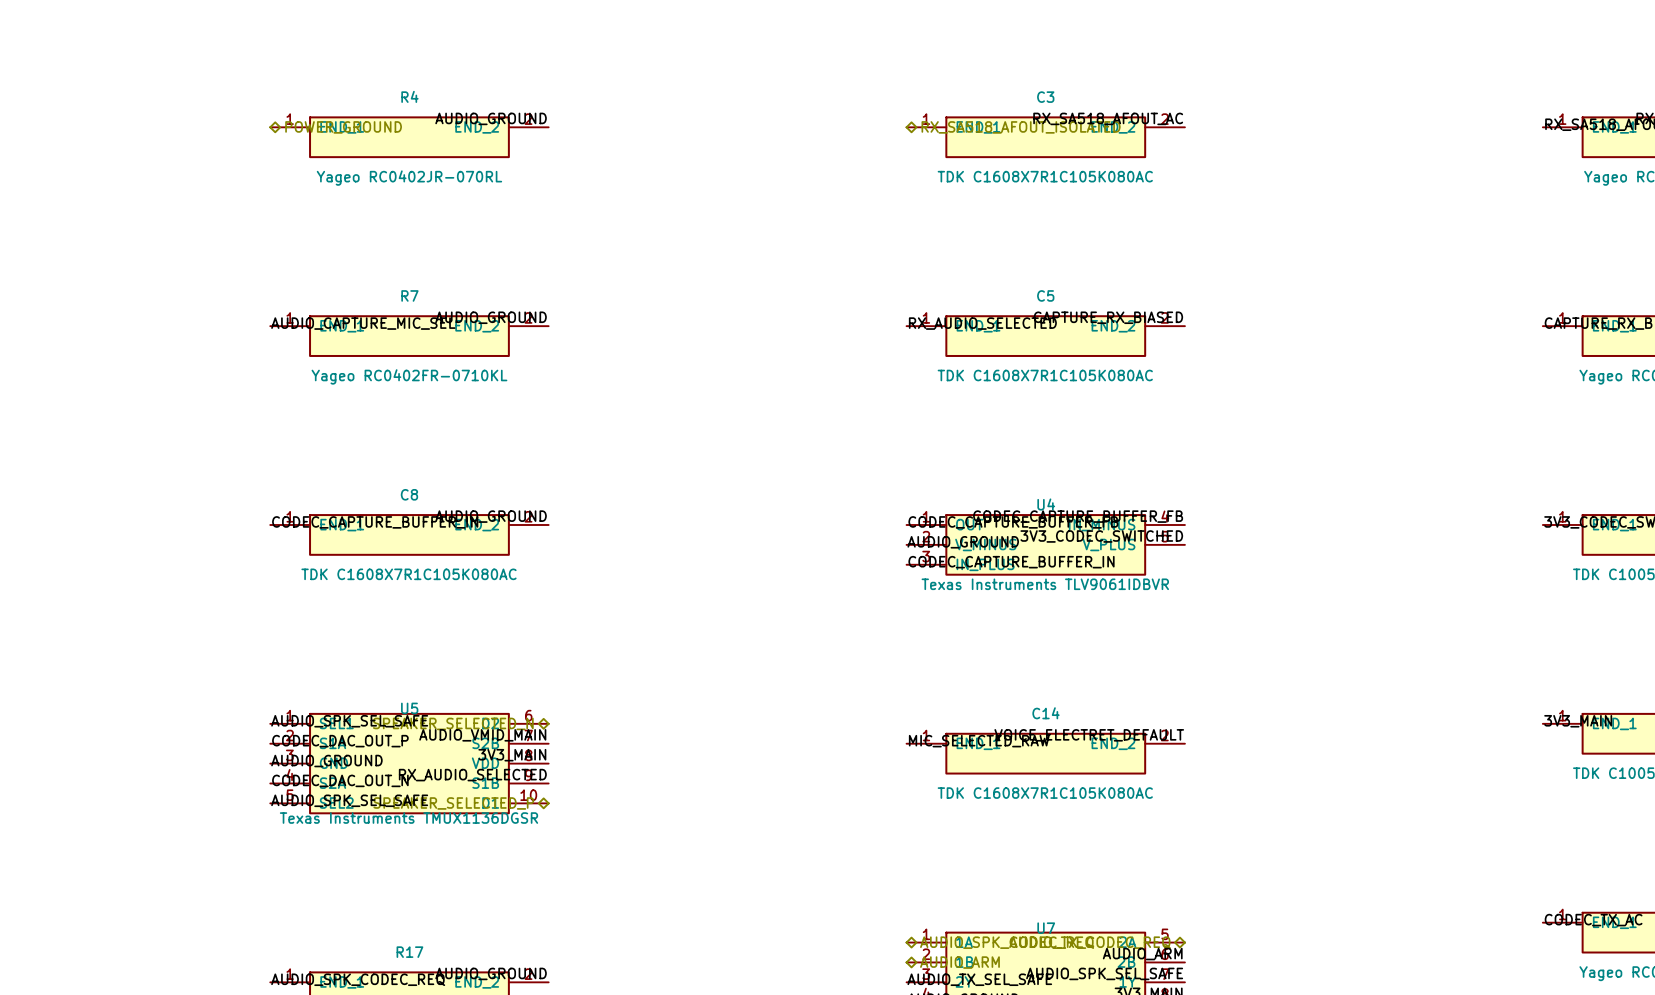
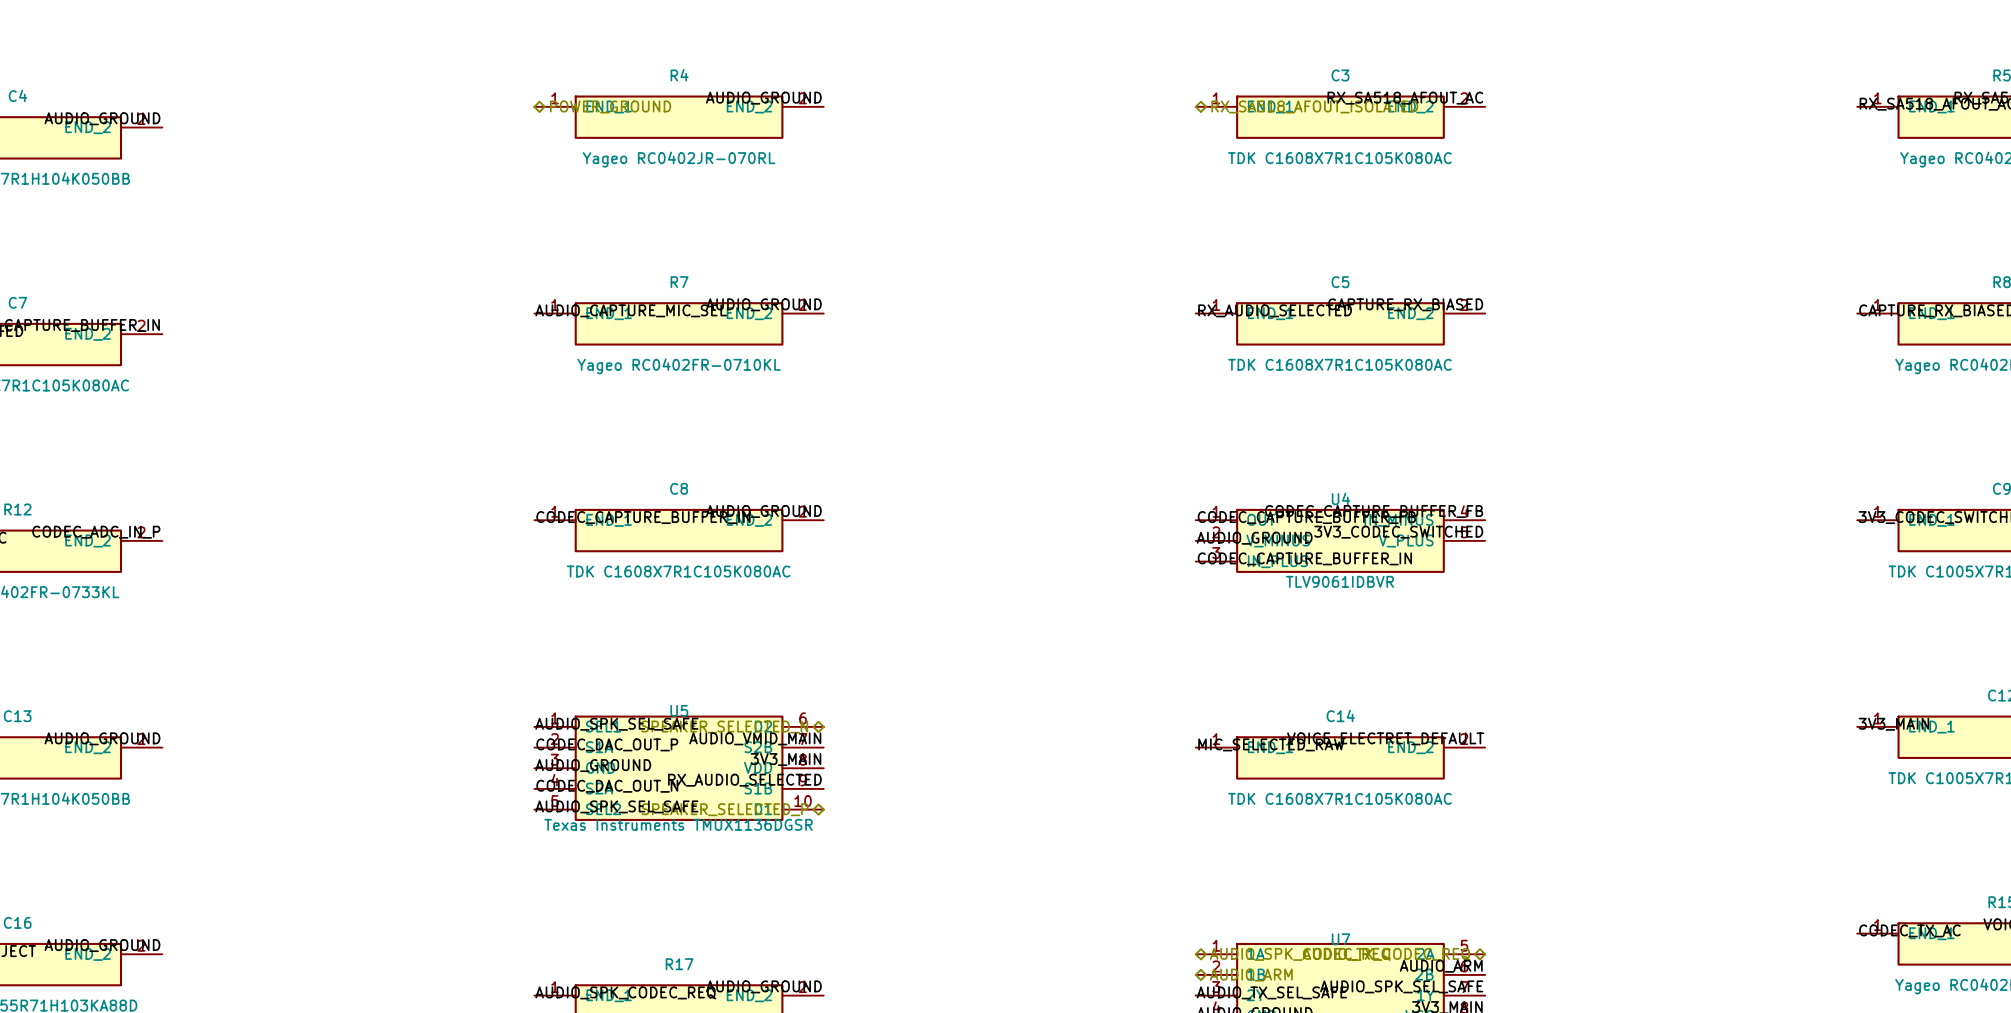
U4 value: Texas Instruments TLV9061IDBVR (1045, 584) -> TLV9061IDBVR (1339, 581)

